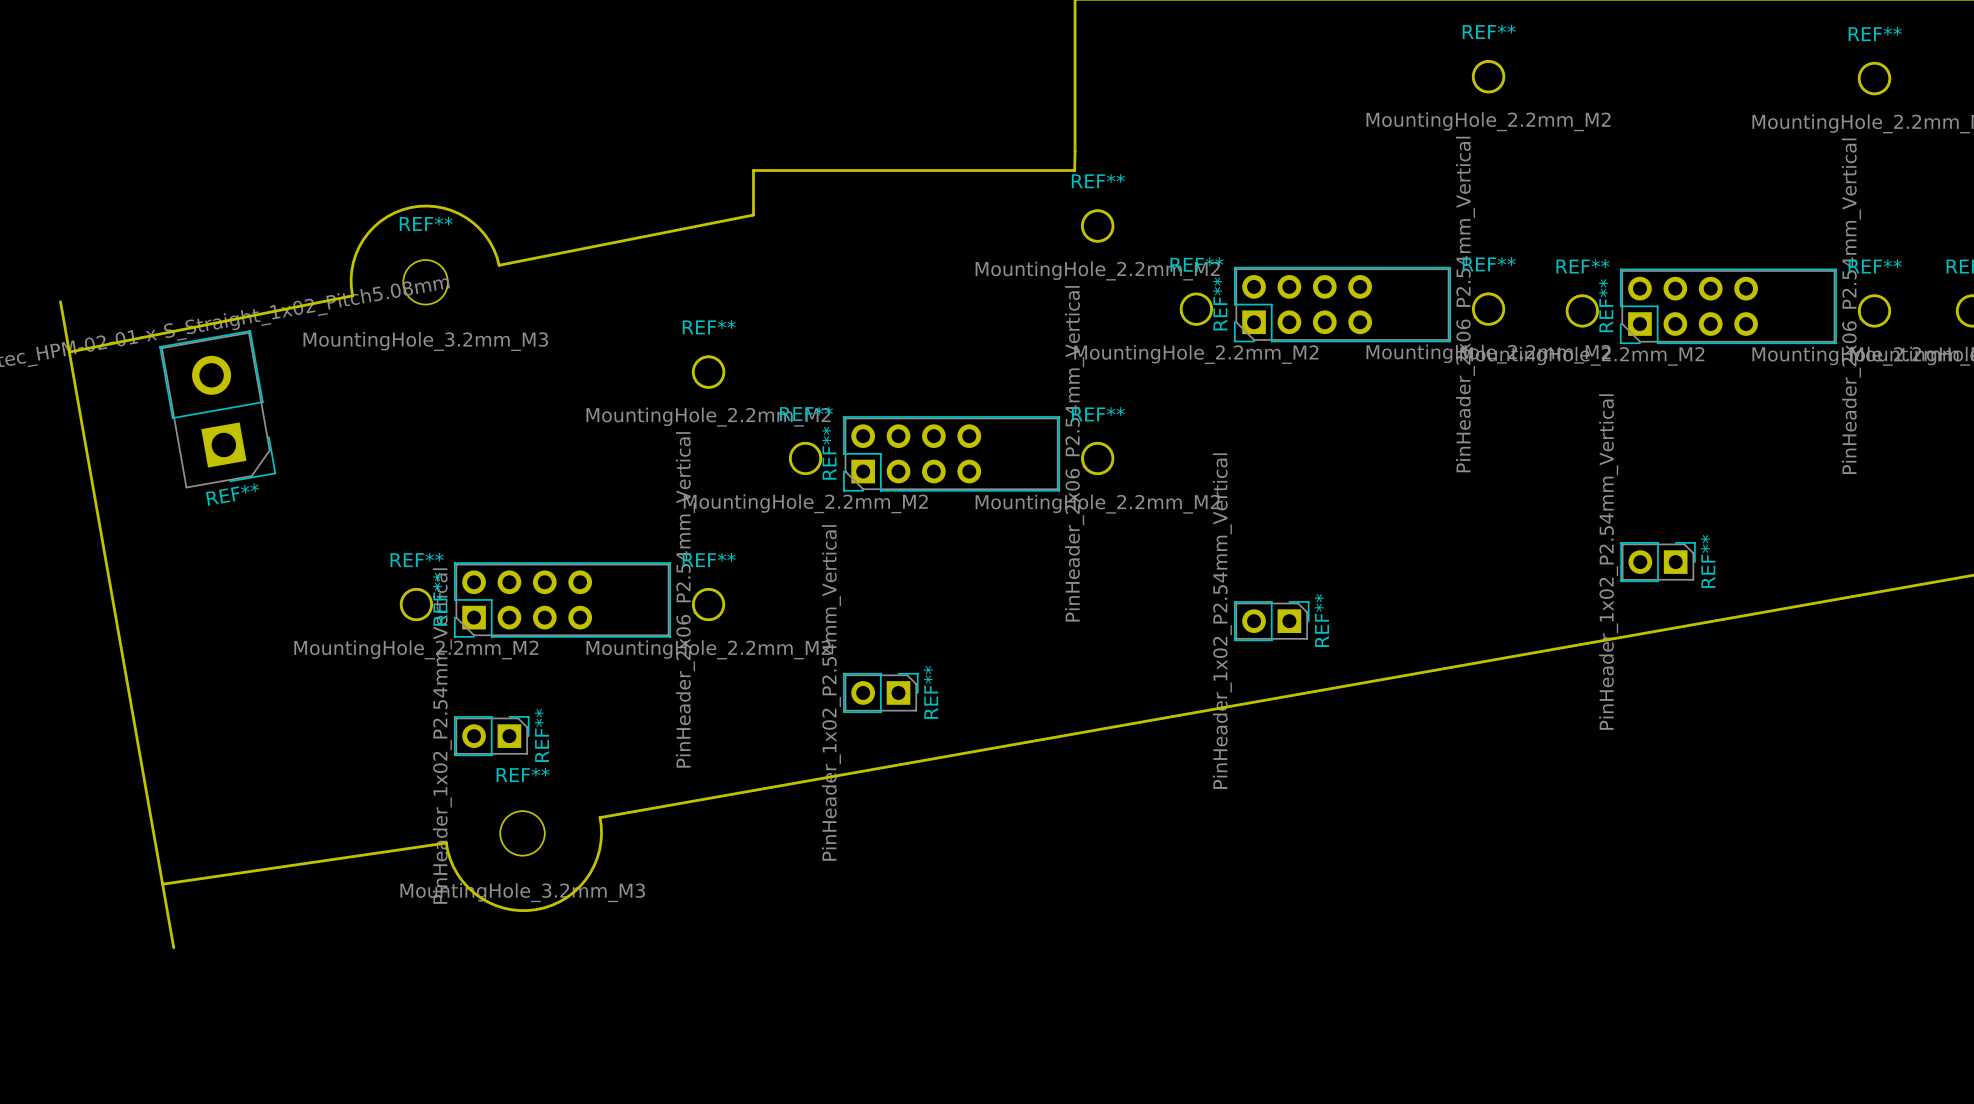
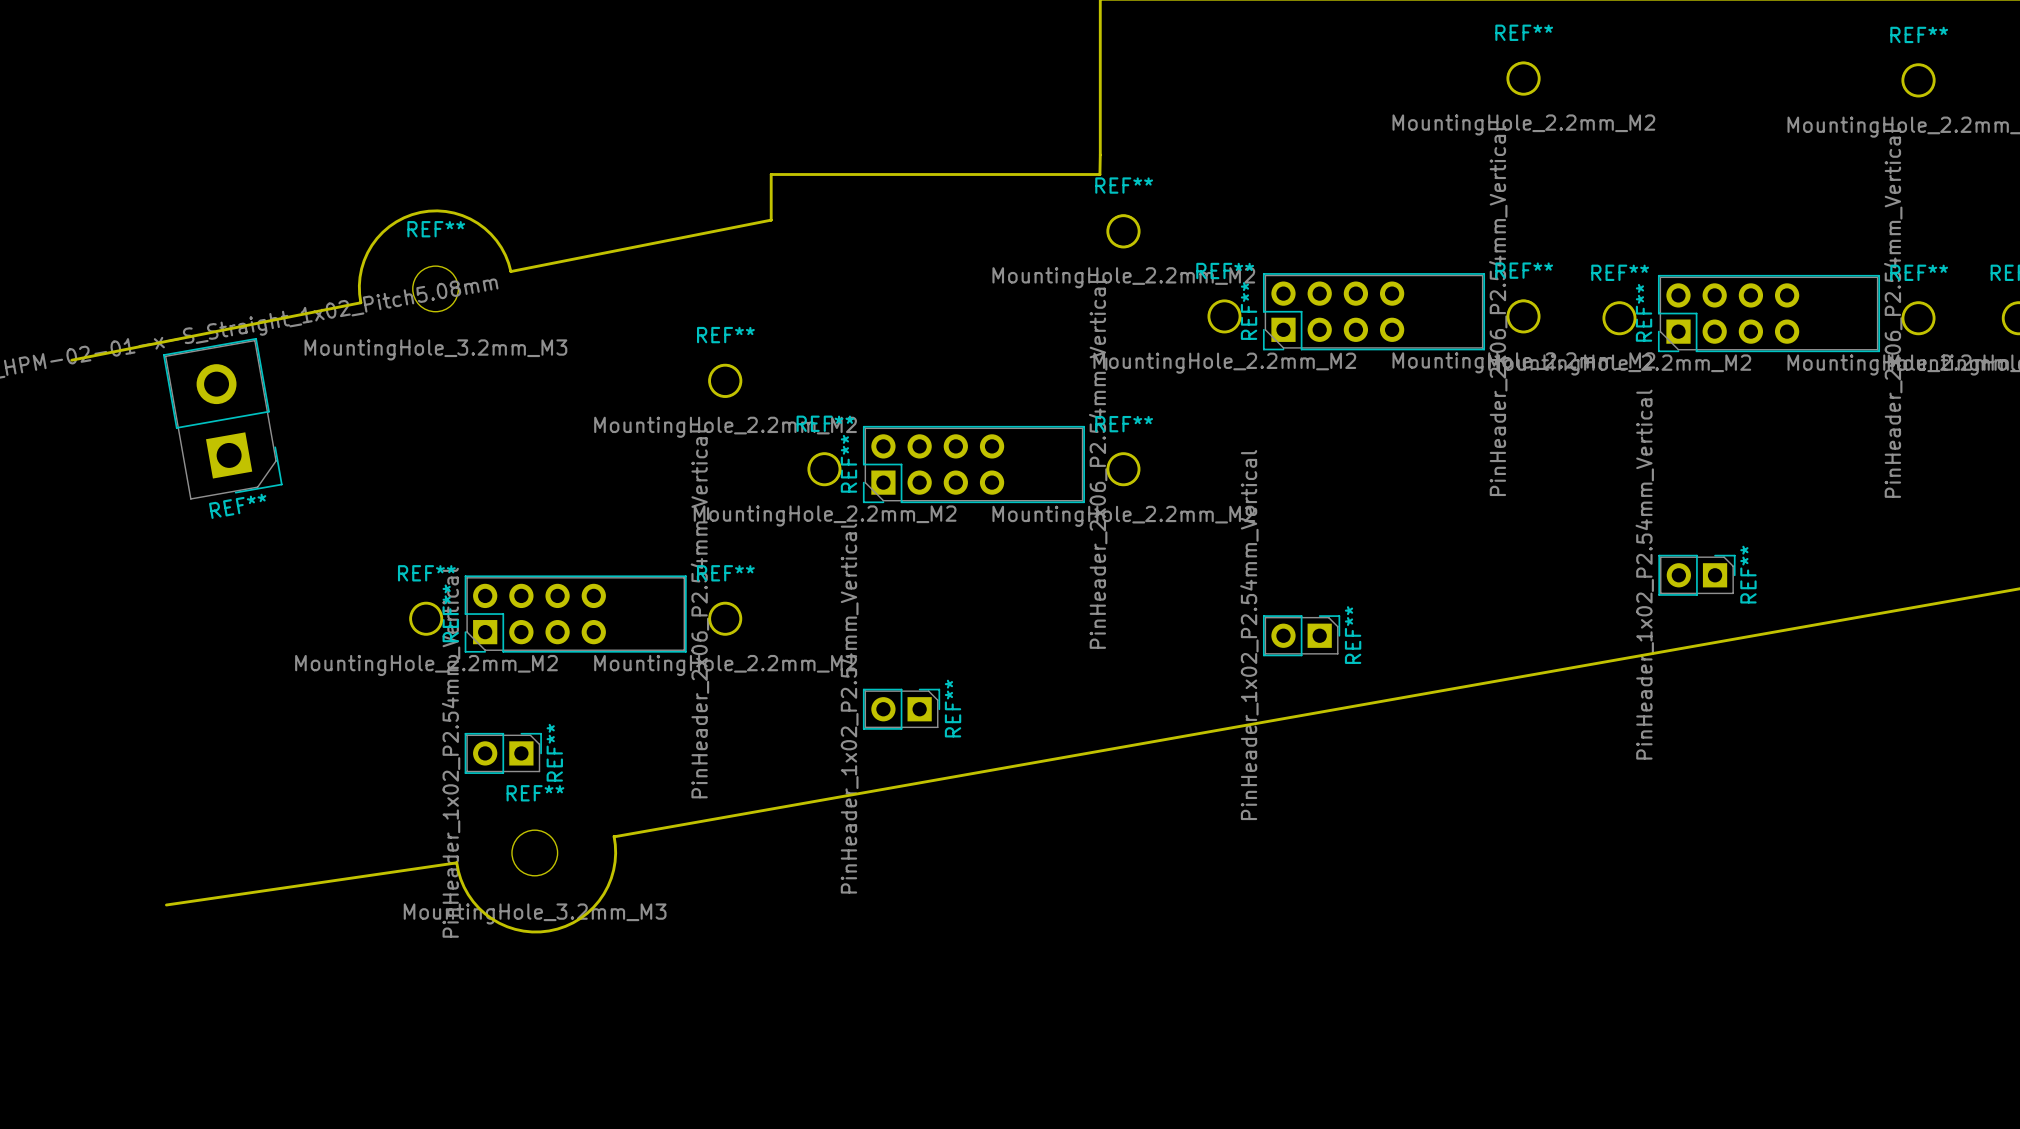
board edge: (60, 301) (173, 947) -> none

